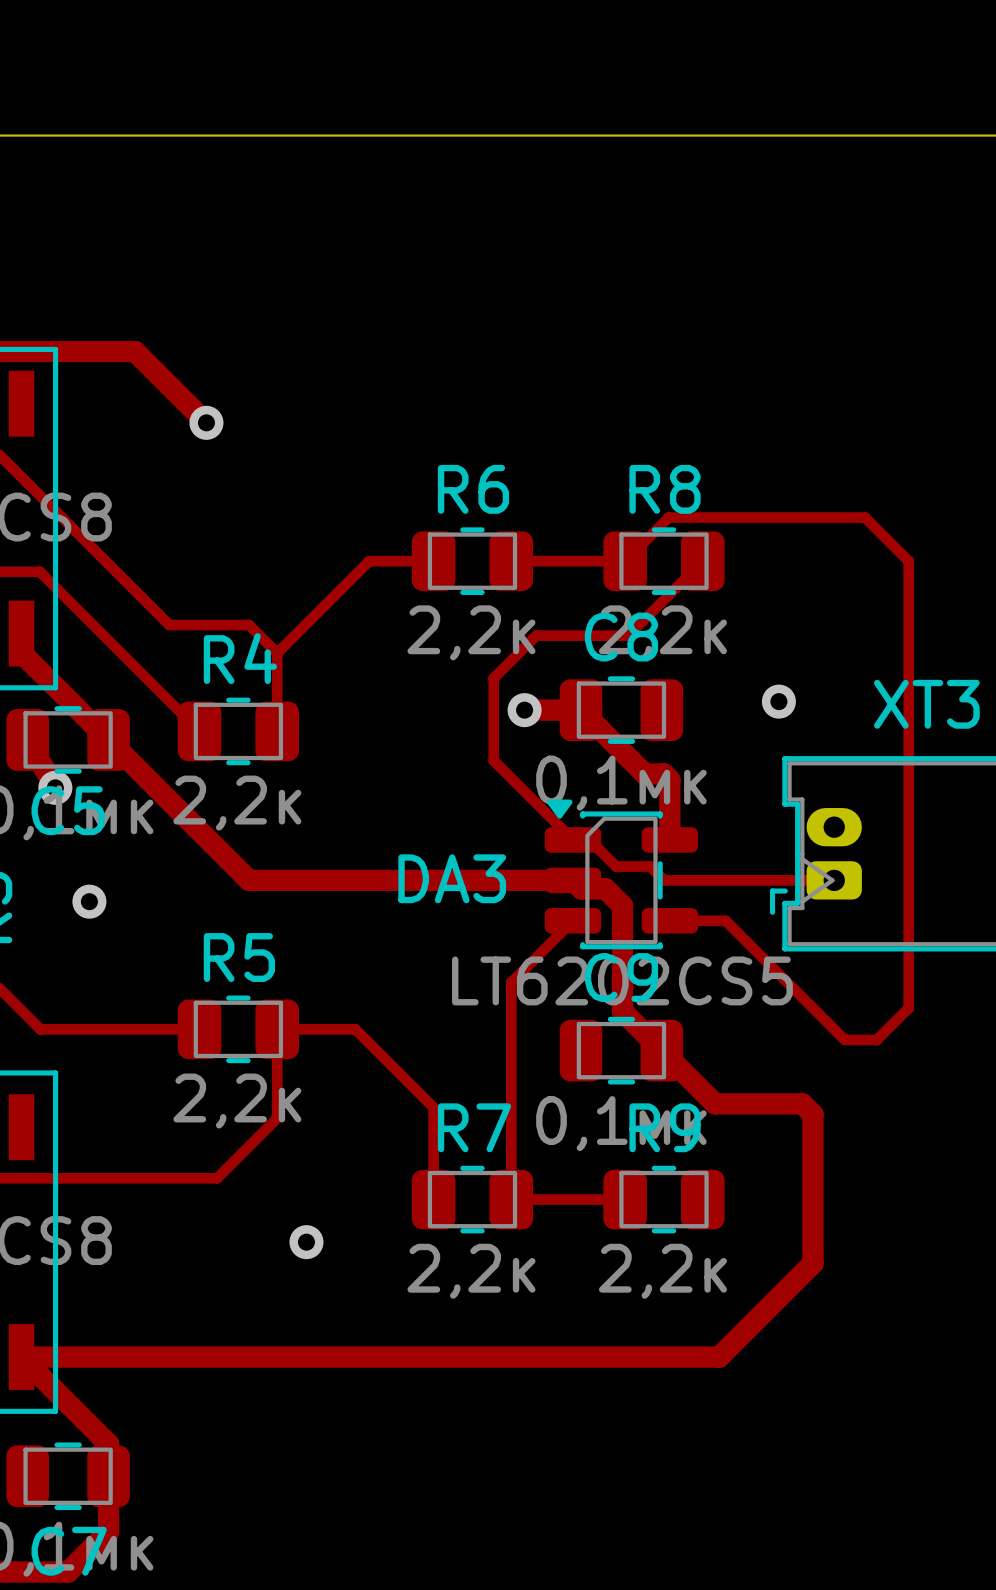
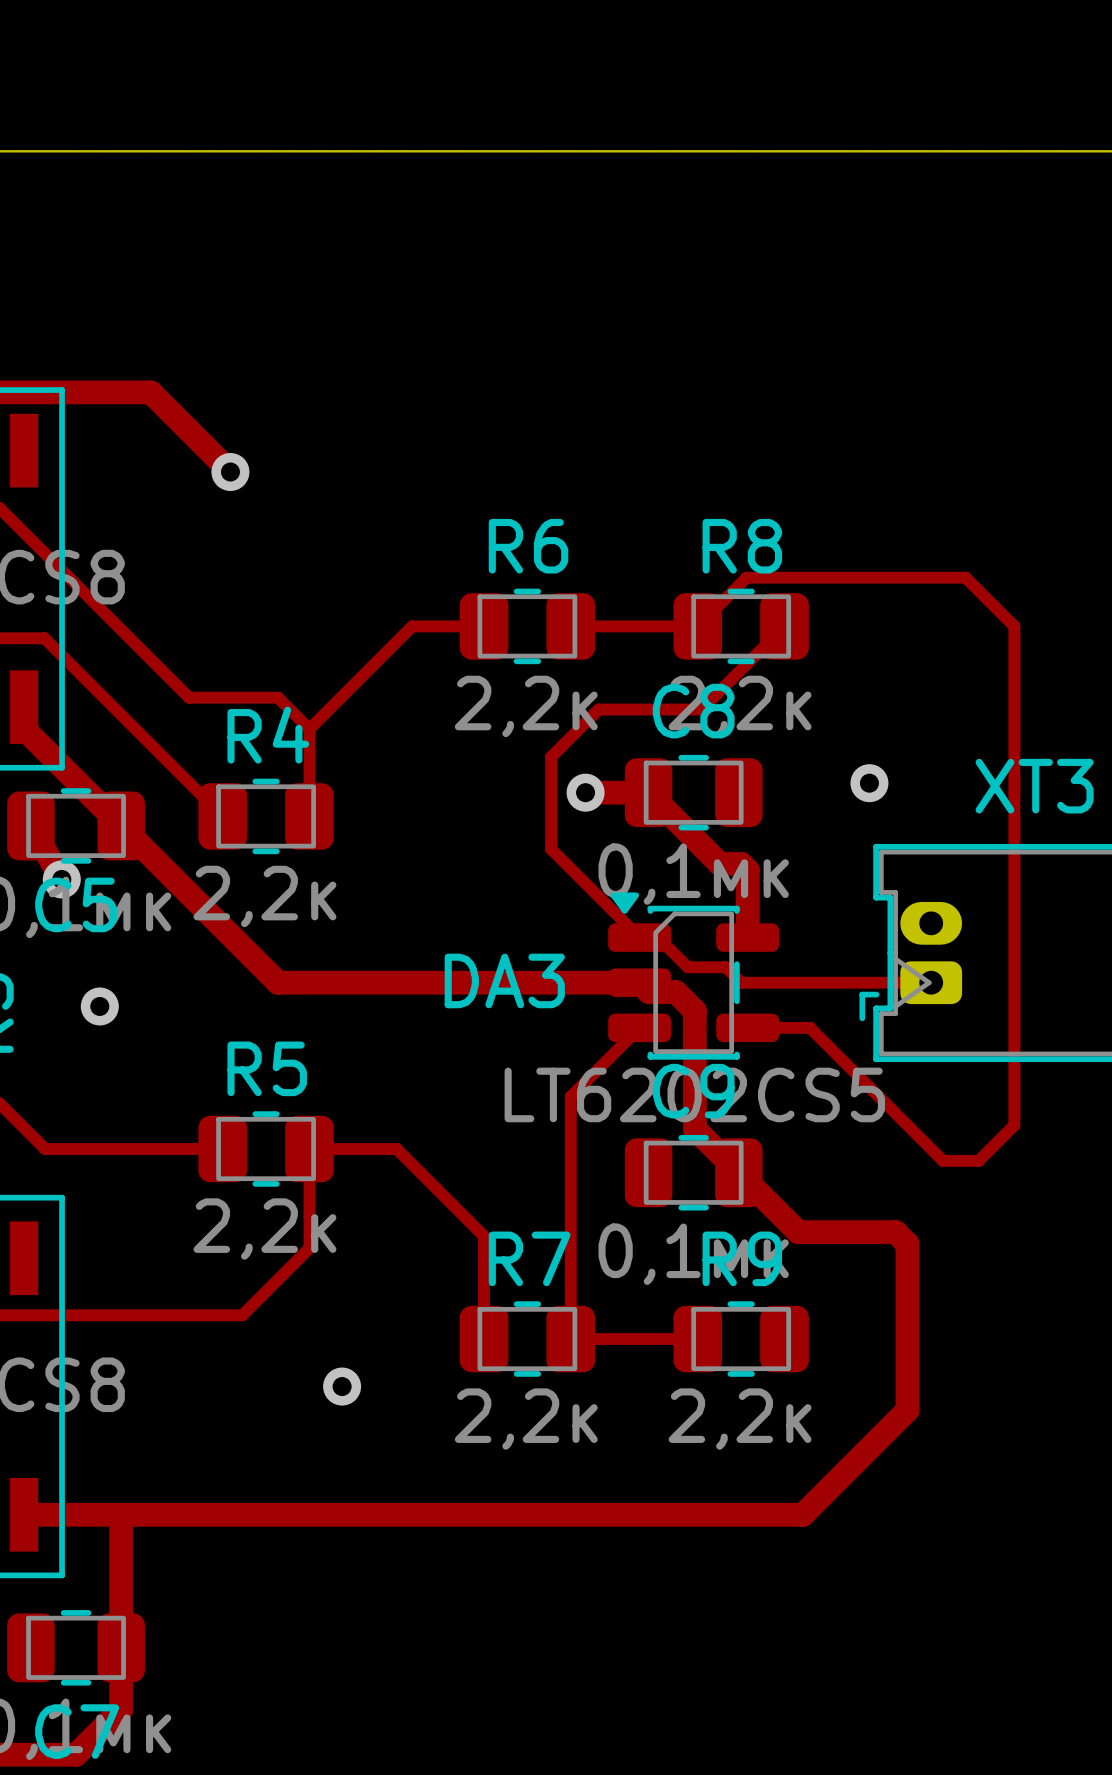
track: (21, 1357) (108, 1444) -> (121, 1514) (121, 1611)

